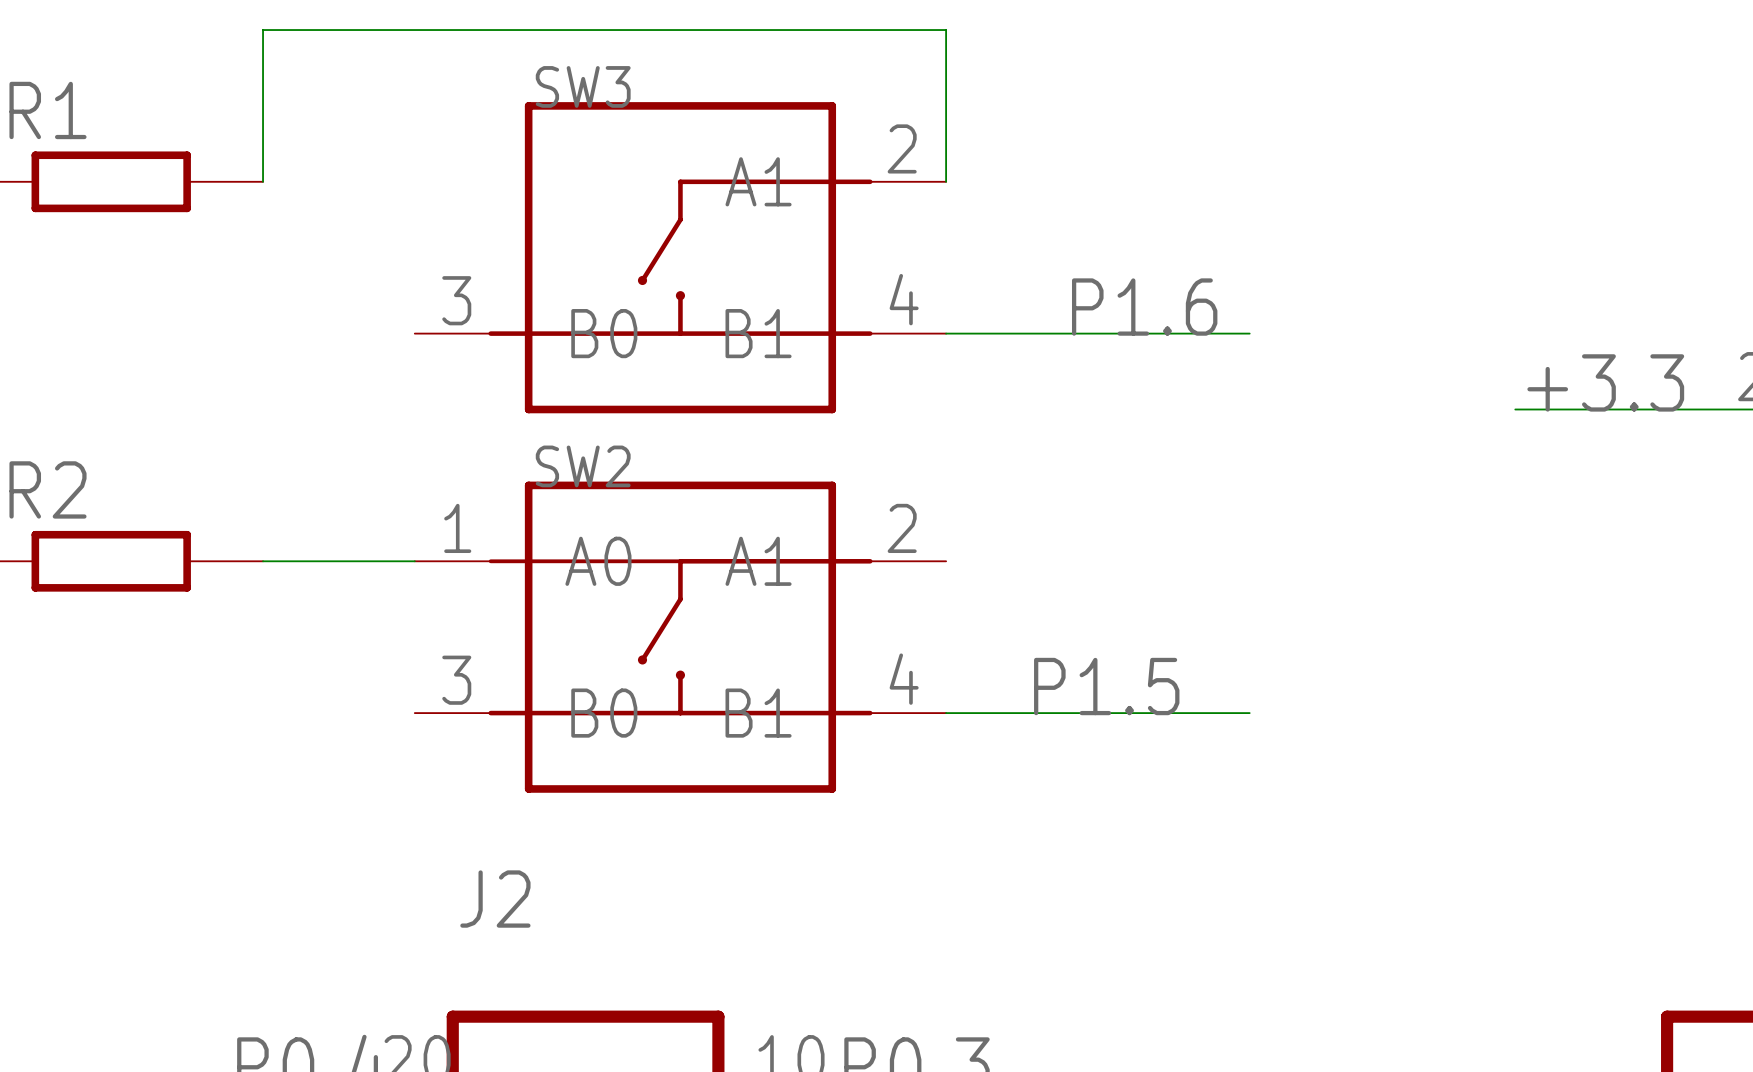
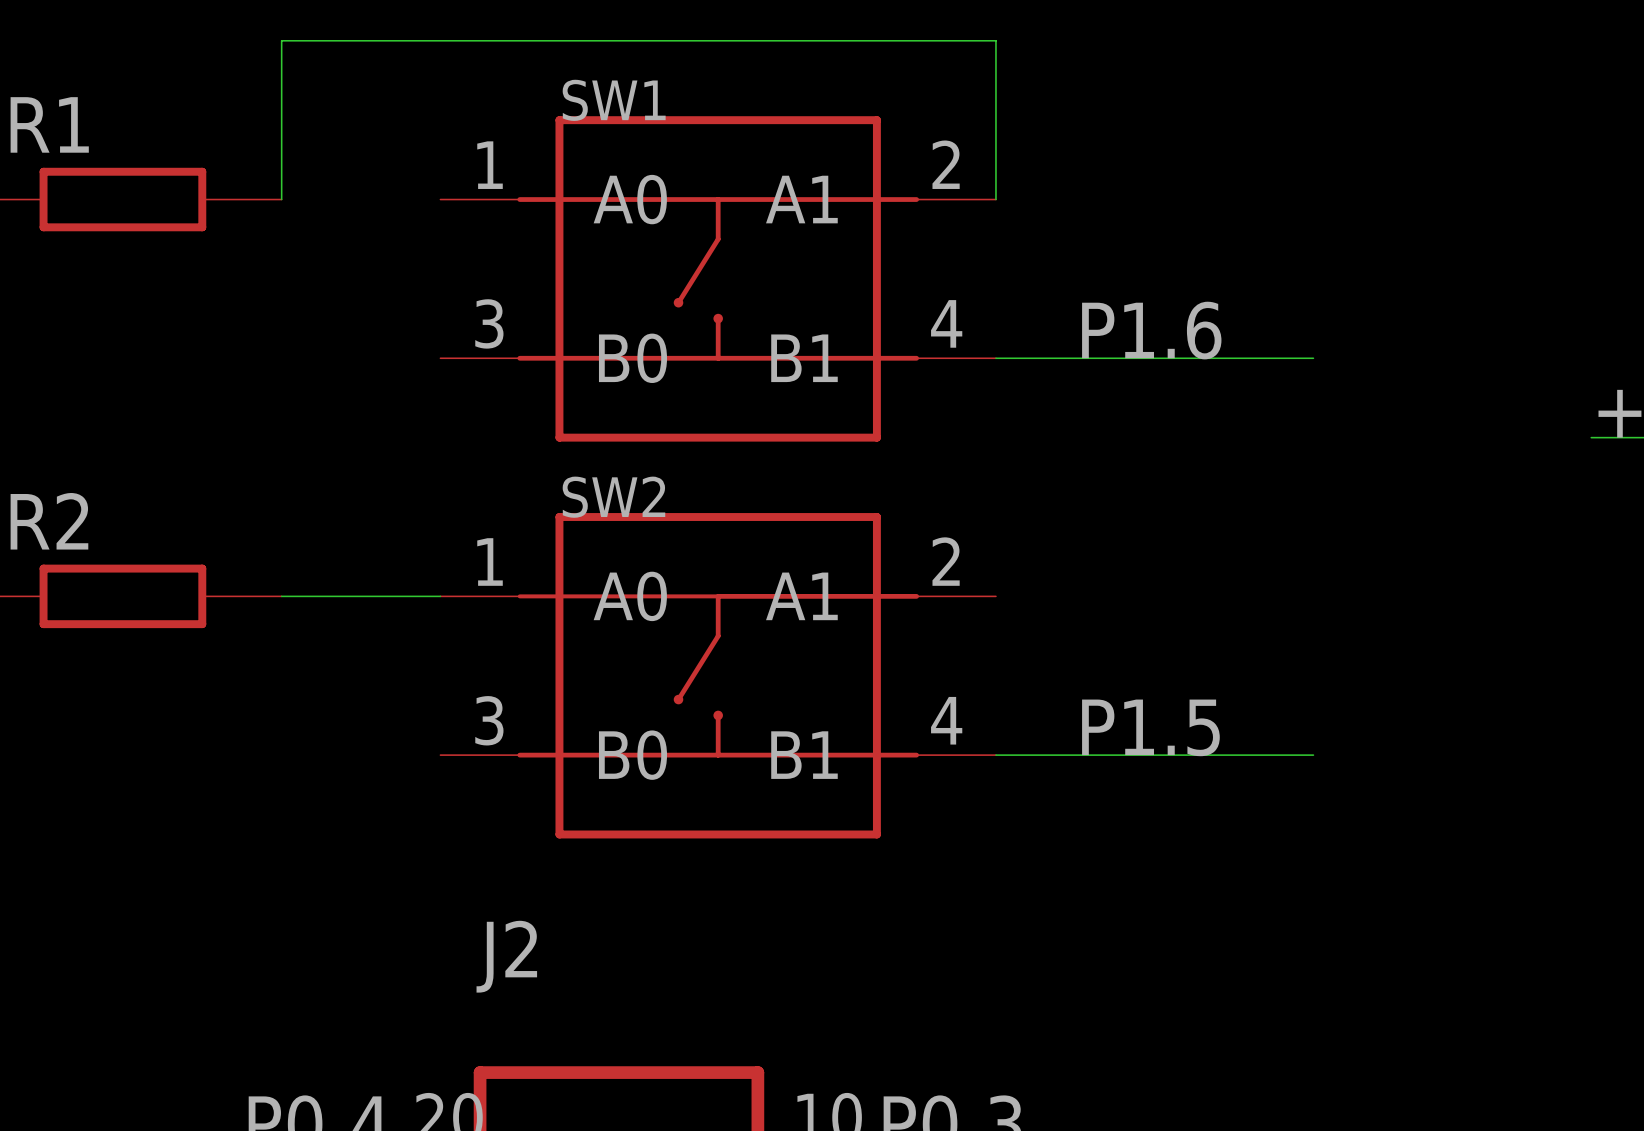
SW3: (680, 257) -> none
SW1: none -> (718, 278)
label position: P1.6 (1144, 307) -> P1.6 (1151, 330)

